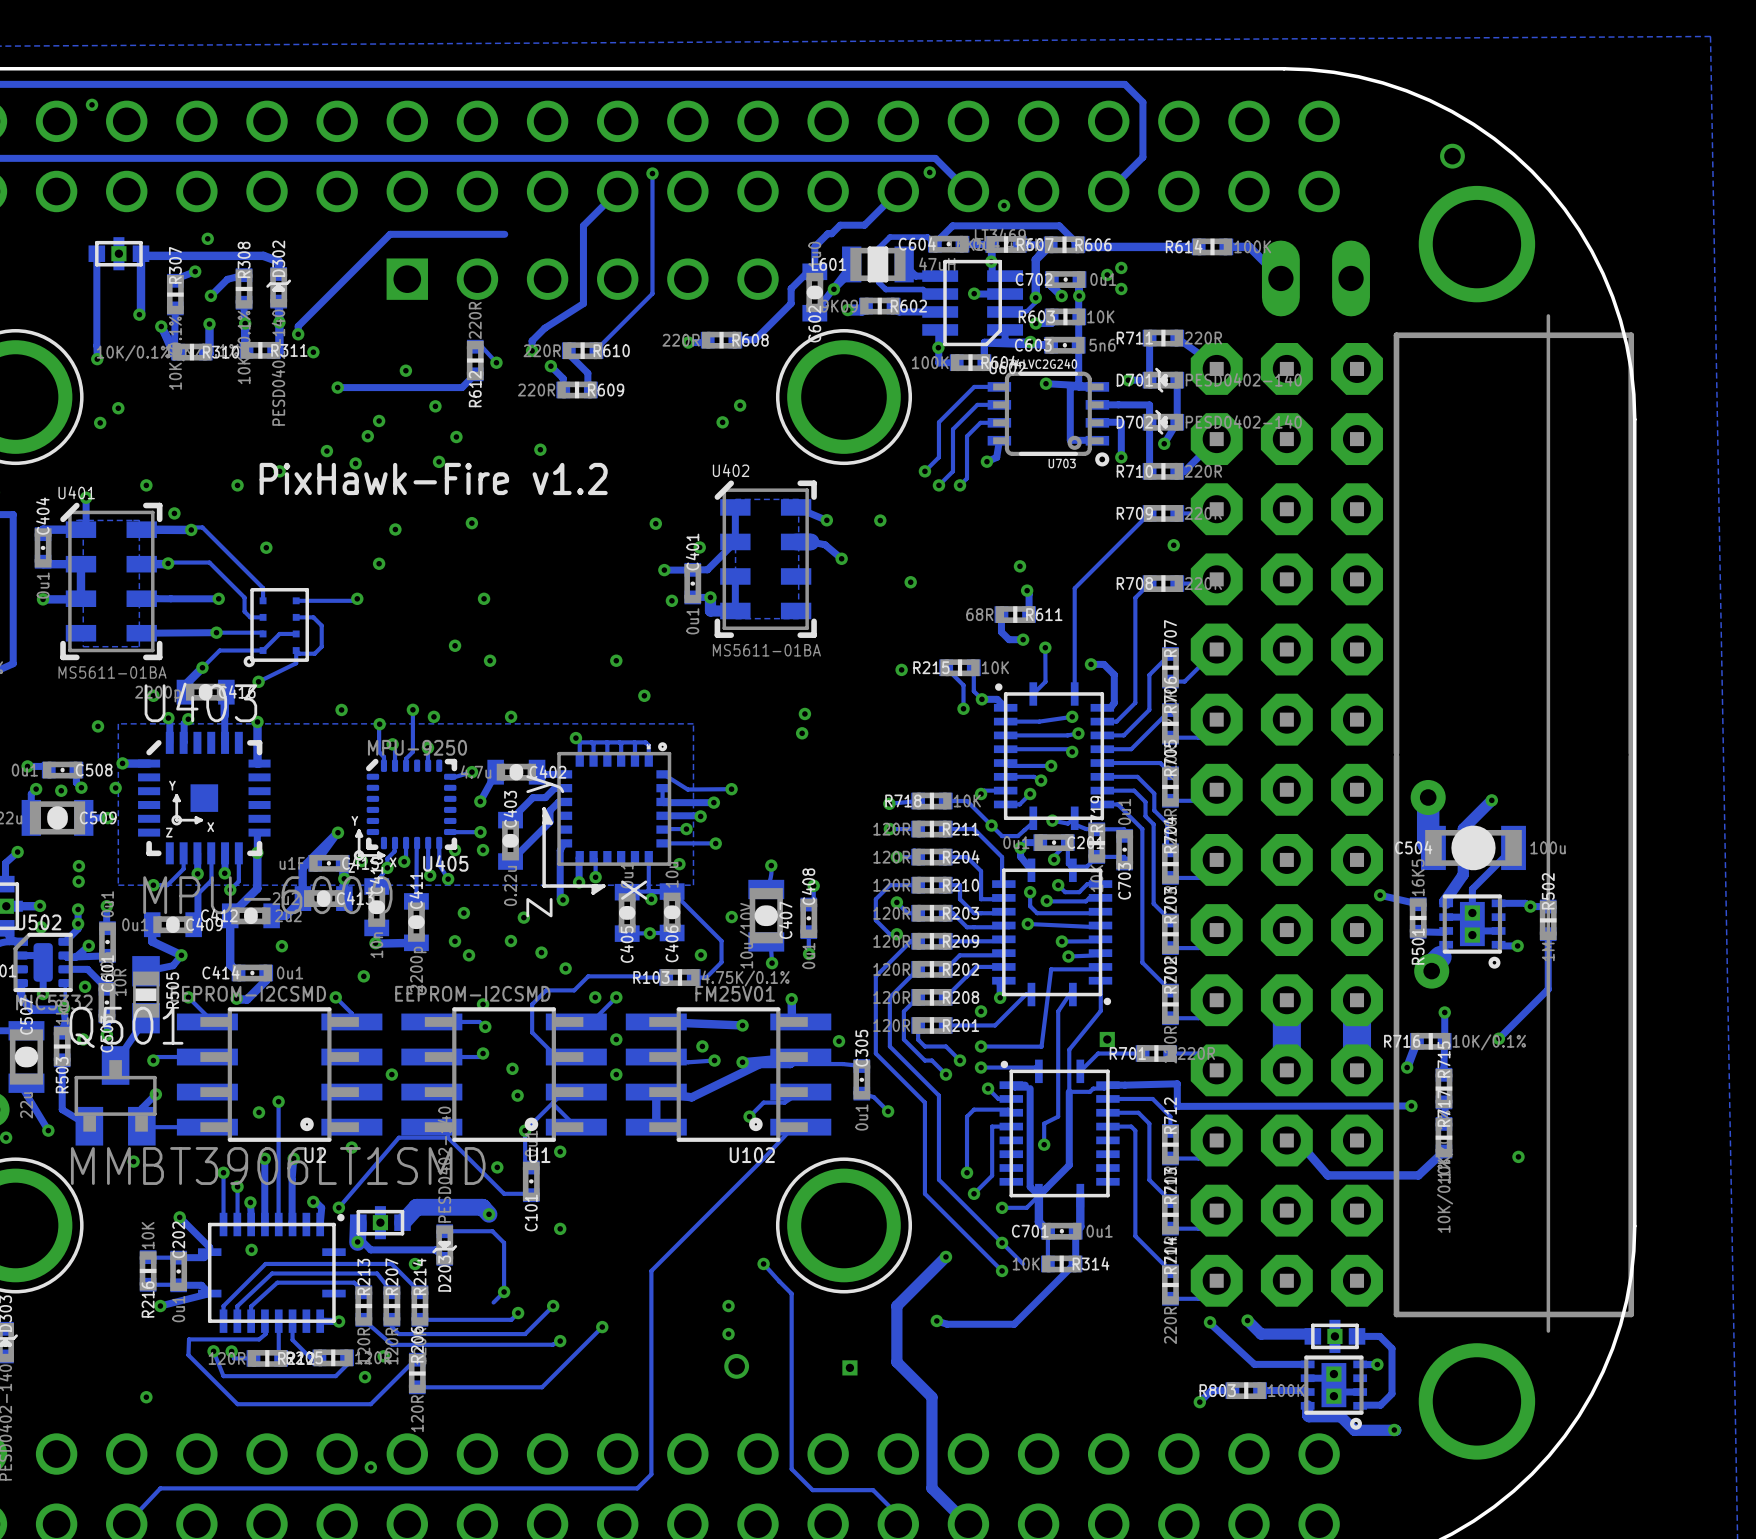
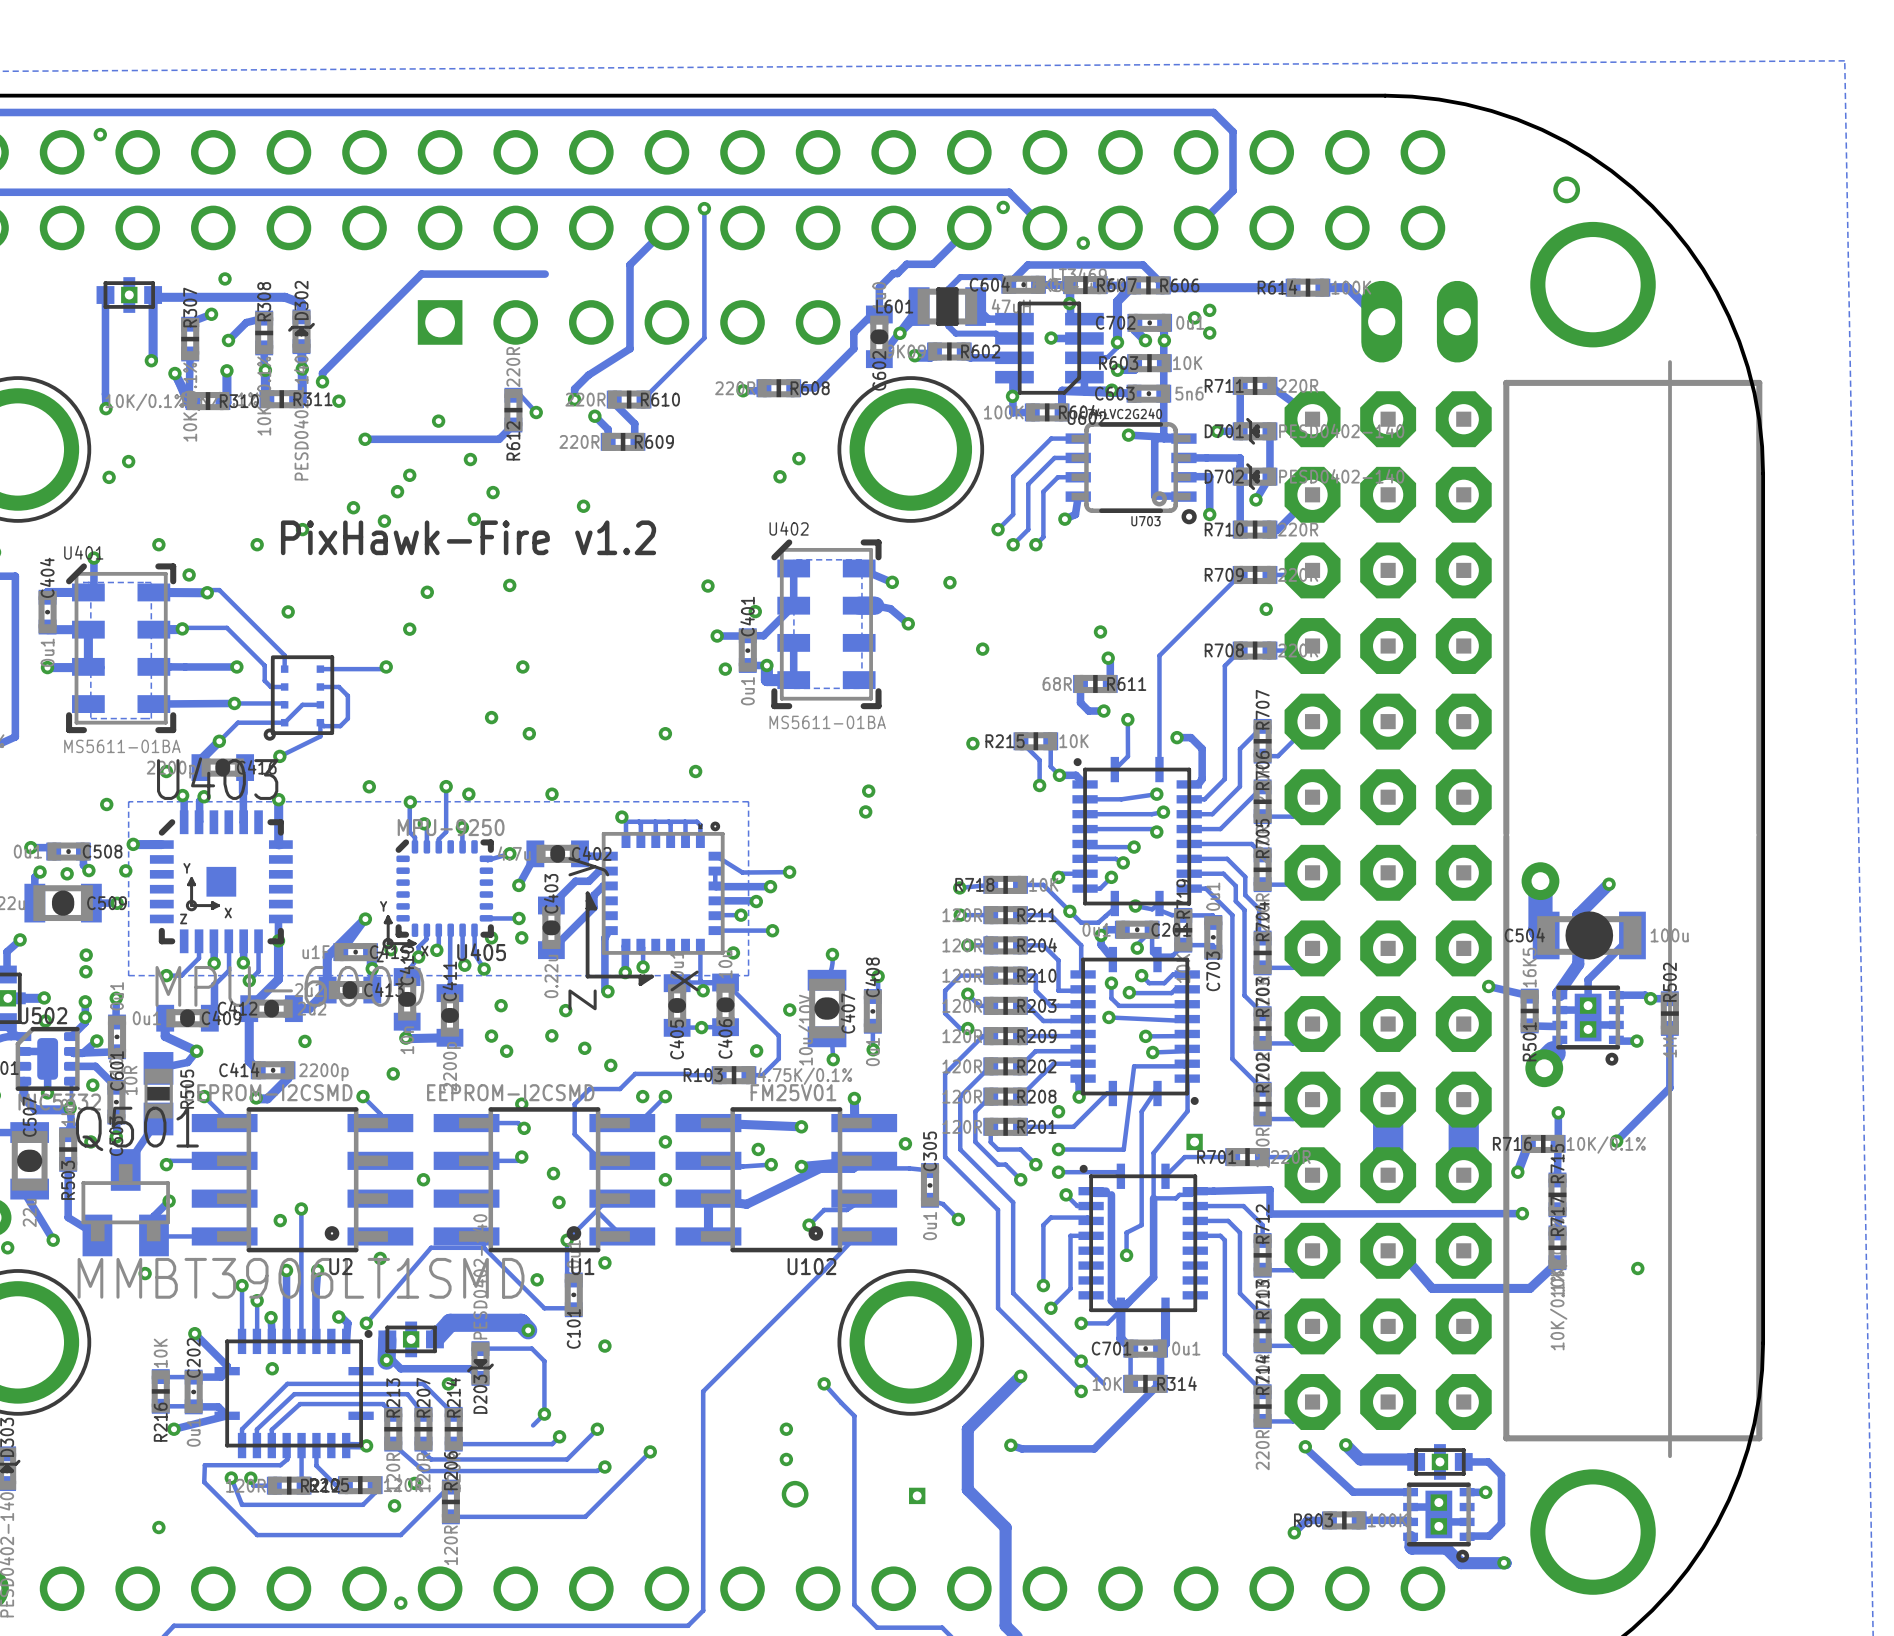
C414 value: 0u1 (290, 972) -> 2200p (323, 1072)

